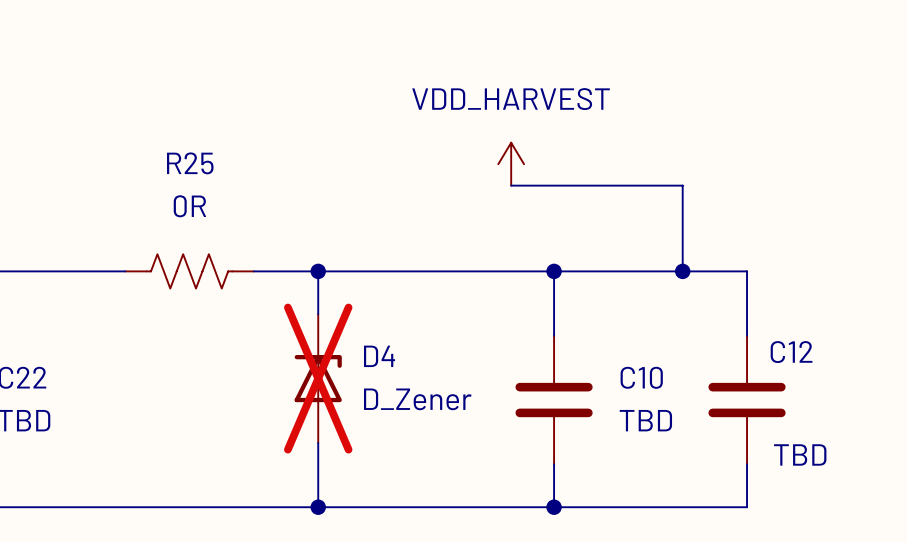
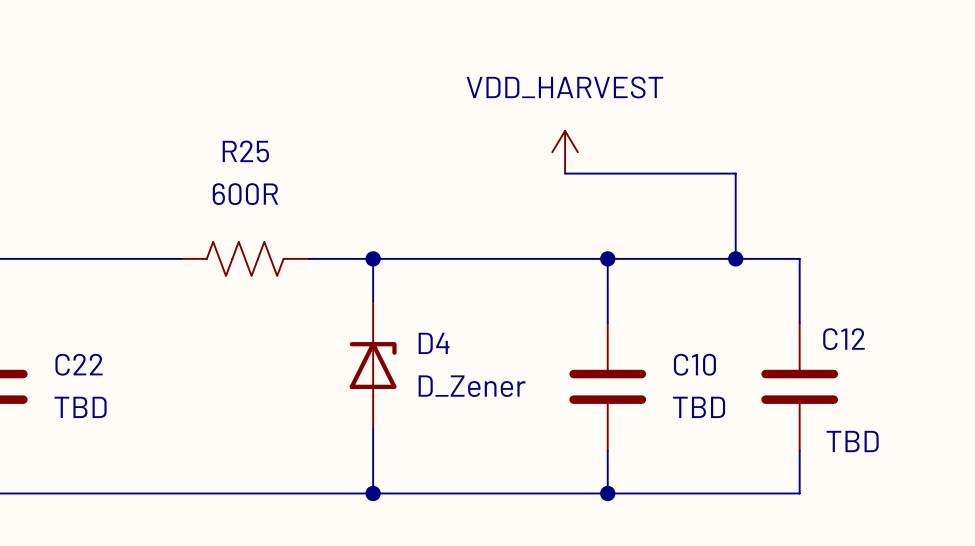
R25 value: 0R (189, 206) -> 600R (245, 194)
D4 do-not-place cross: (318, 378) -> none

